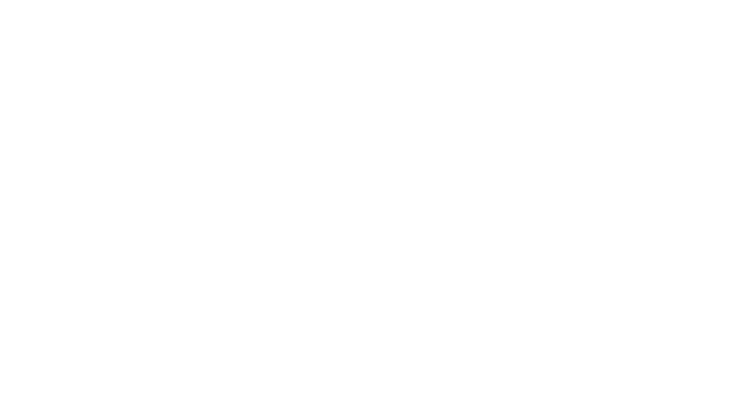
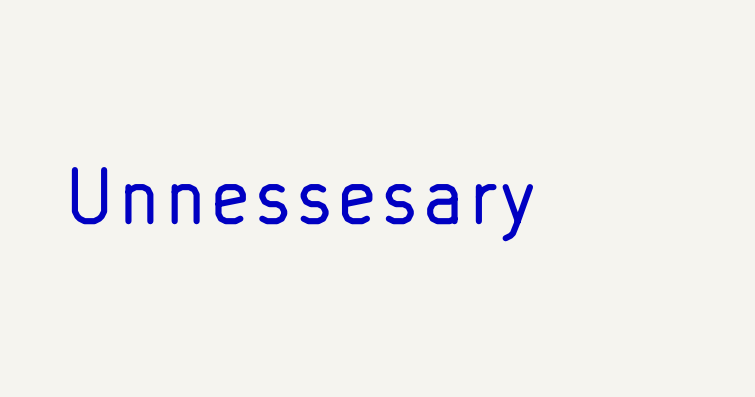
text: none -> Unnessesary (302, 204)

